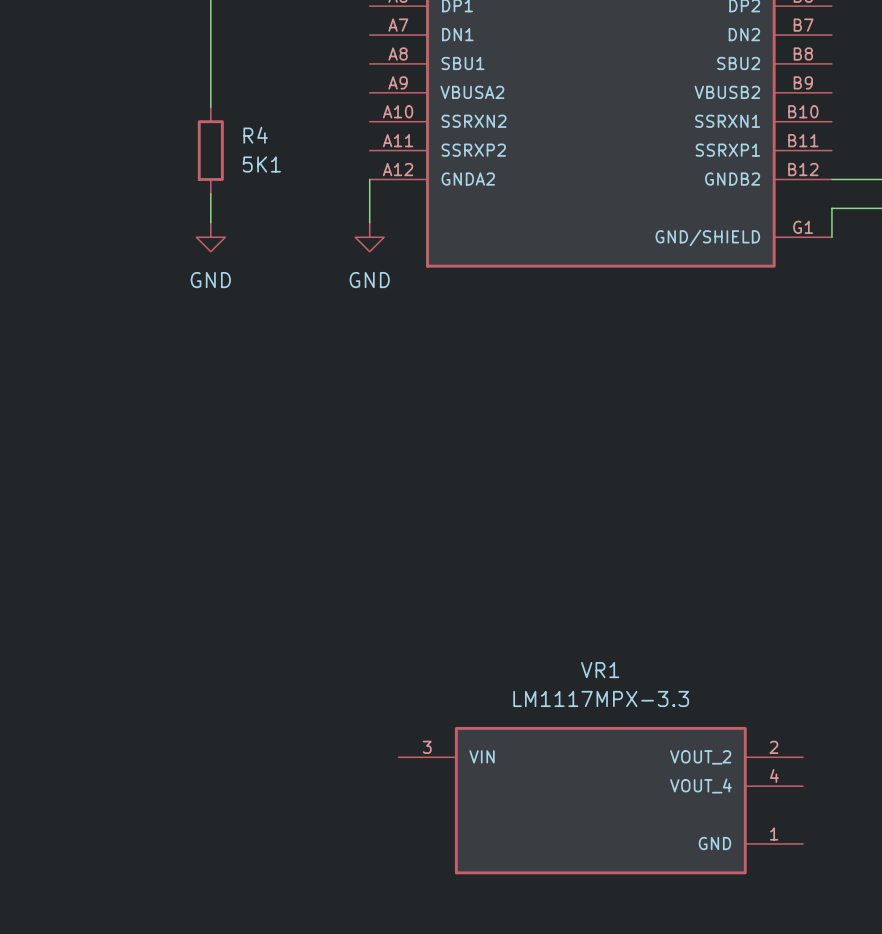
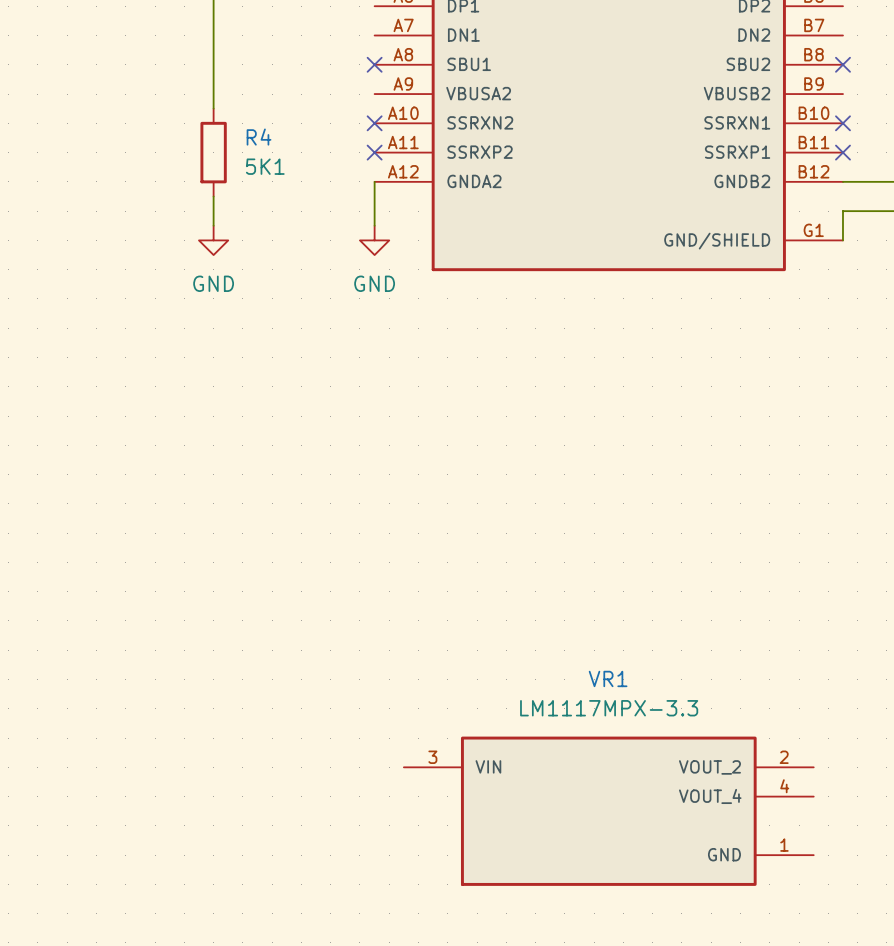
no-connect mark: none -> (374, 64)
no-connect mark: none -> (842, 64)
no-connect mark: none -> (374, 123)
no-connect mark: none -> (842, 123)
no-connect mark: none -> (374, 152)
no-connect mark: none -> (842, 152)

